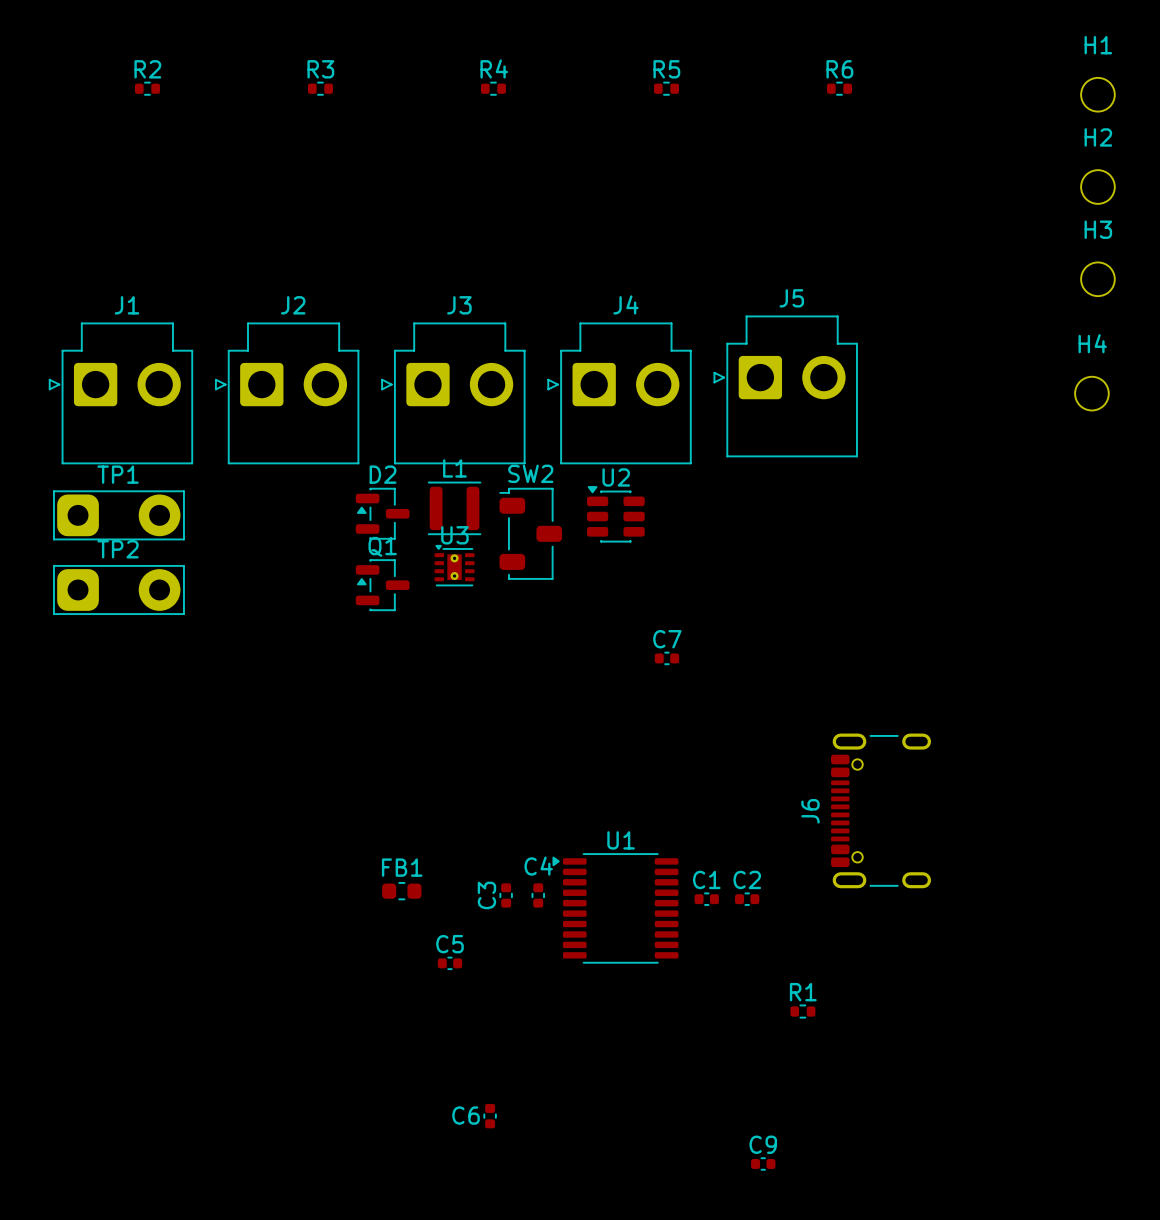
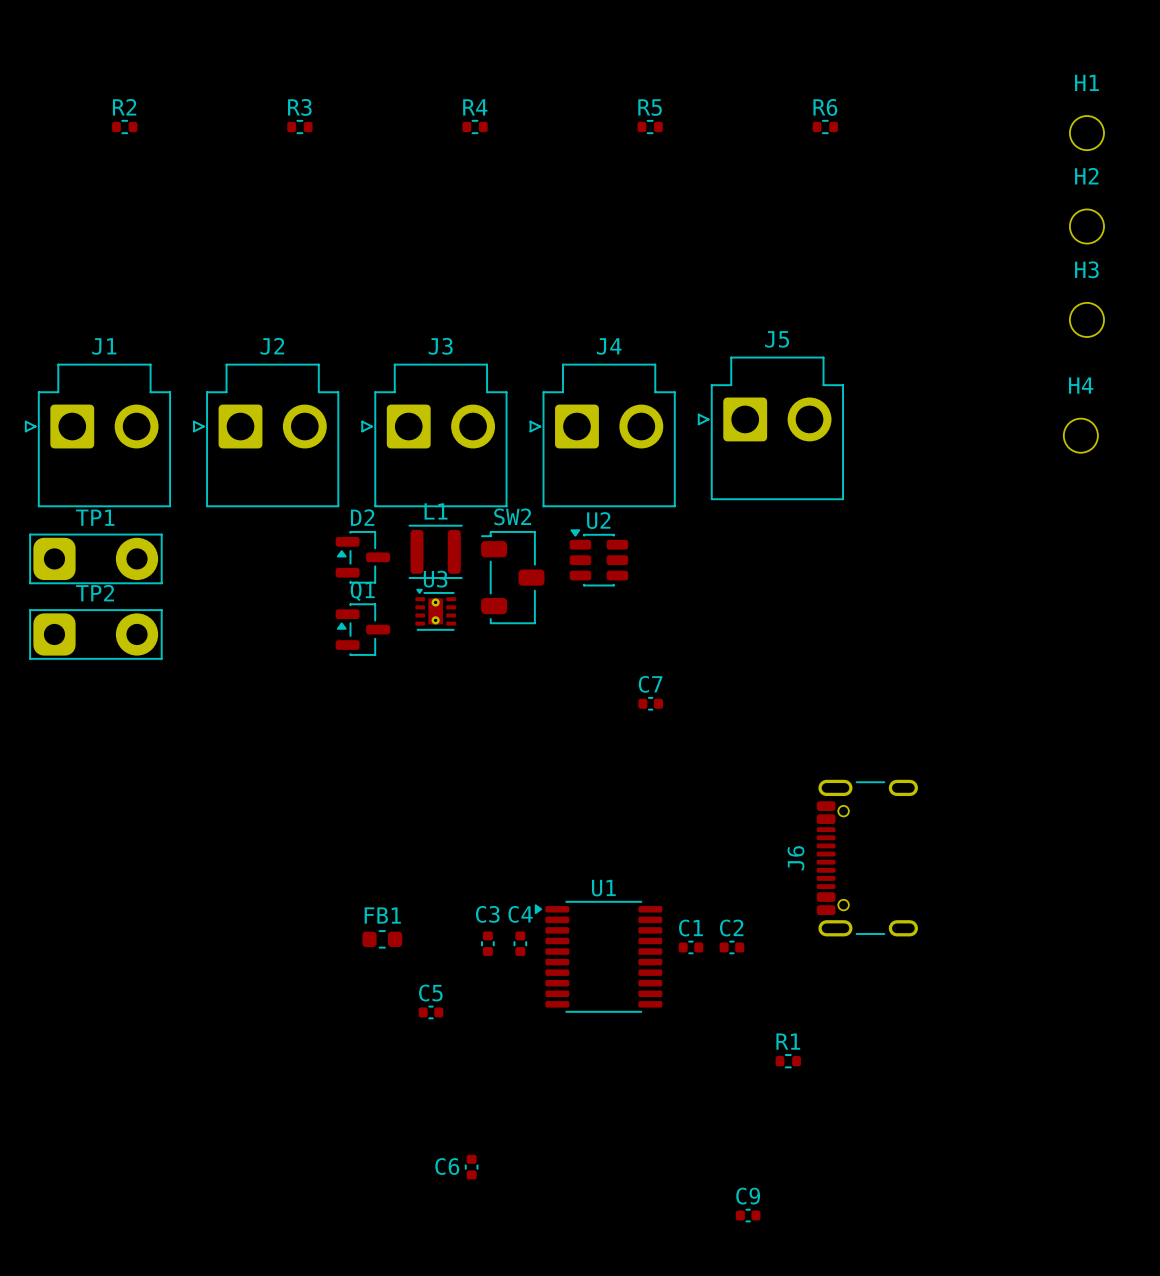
C3 name rotation: 0° (486, 895) -> 90° clockwise (487, 914)

